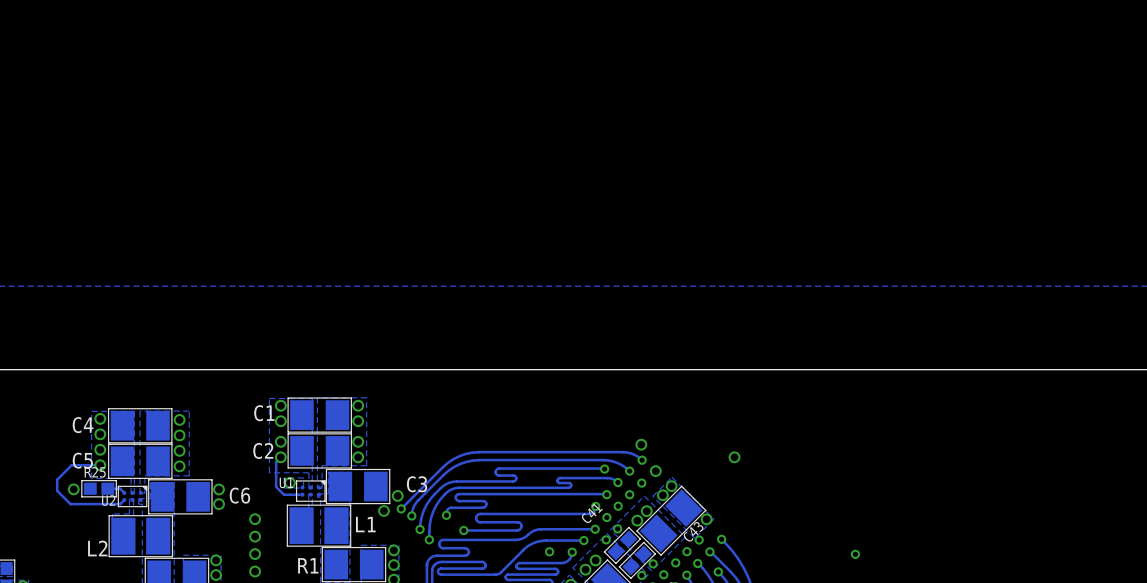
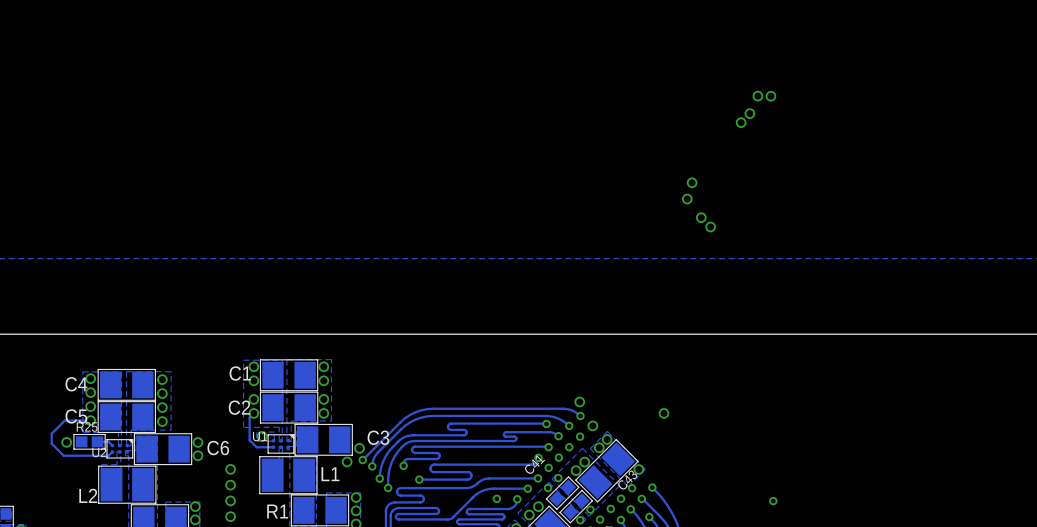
via: none -> (757, 96)
via: none -> (770, 96)
via: none -> (749, 113)
via: none -> (741, 122)
via: none -> (692, 182)
via: none -> (687, 199)
via: none -> (701, 217)
via: none -> (710, 227)

